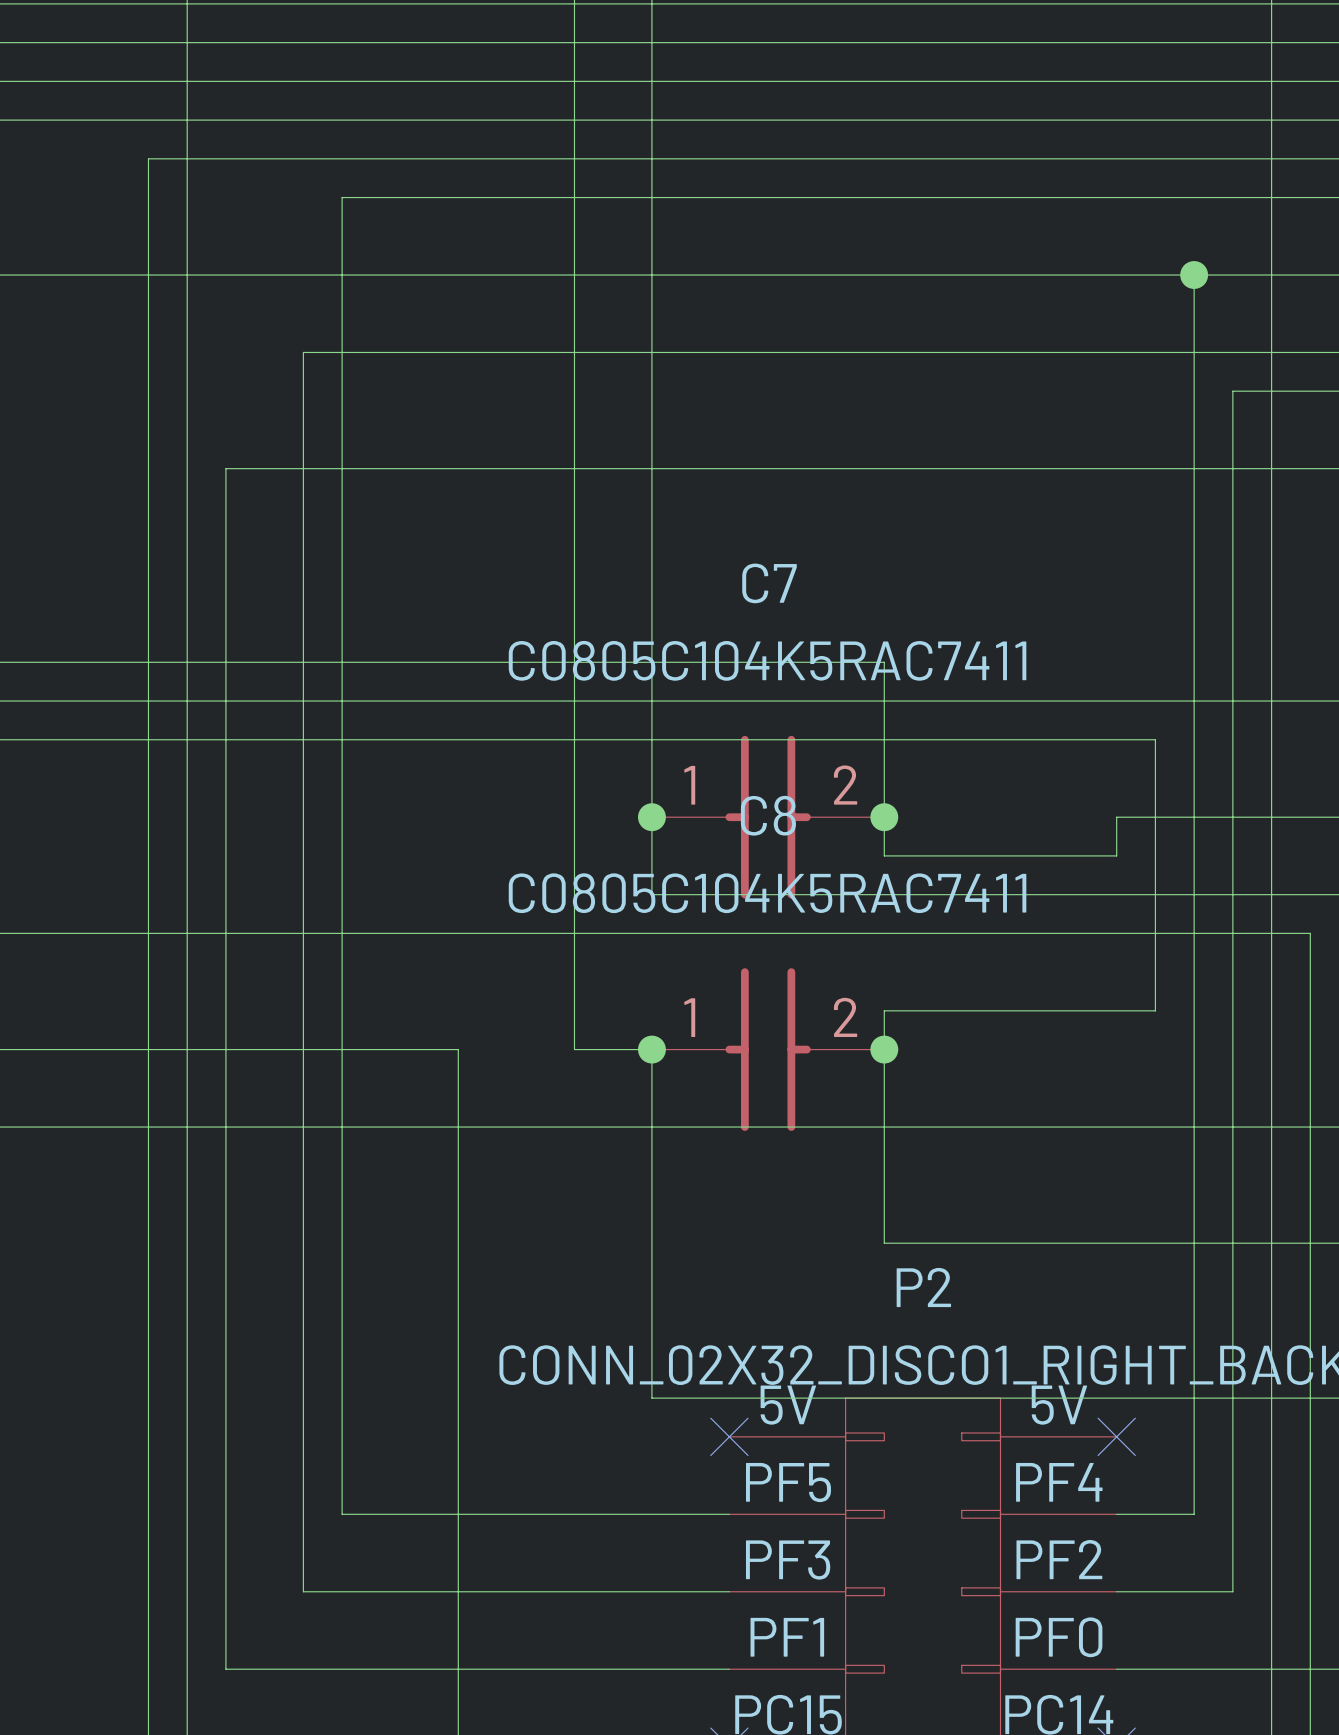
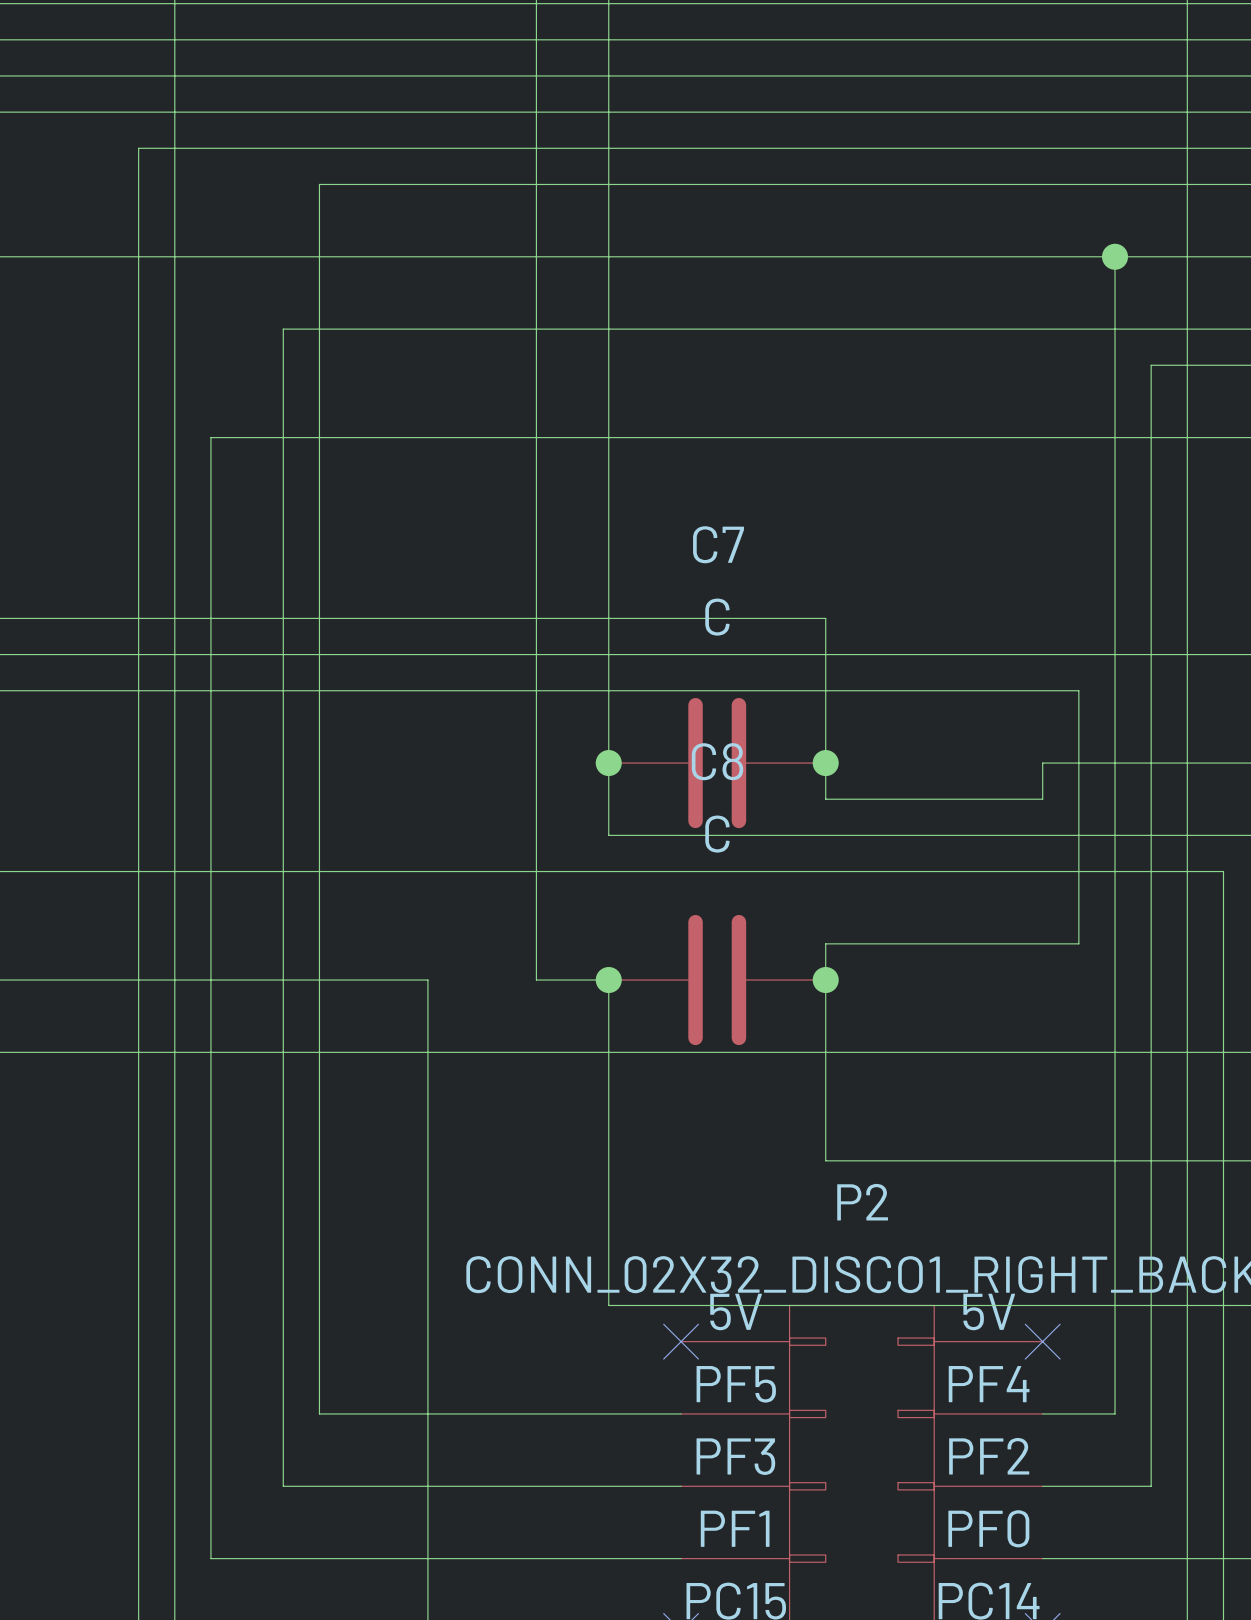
C7 value: C0805C104K5RAC7411 (767, 660) -> C (717, 617)
C7 symbol: [651, 735, 885, 899] -> [608, 697, 826, 829]
C8 value: C0805C104K5RAC7411 (767, 893) -> C (717, 834)
C8 symbol: [651, 968, 885, 1131] -> [608, 914, 826, 1046]

